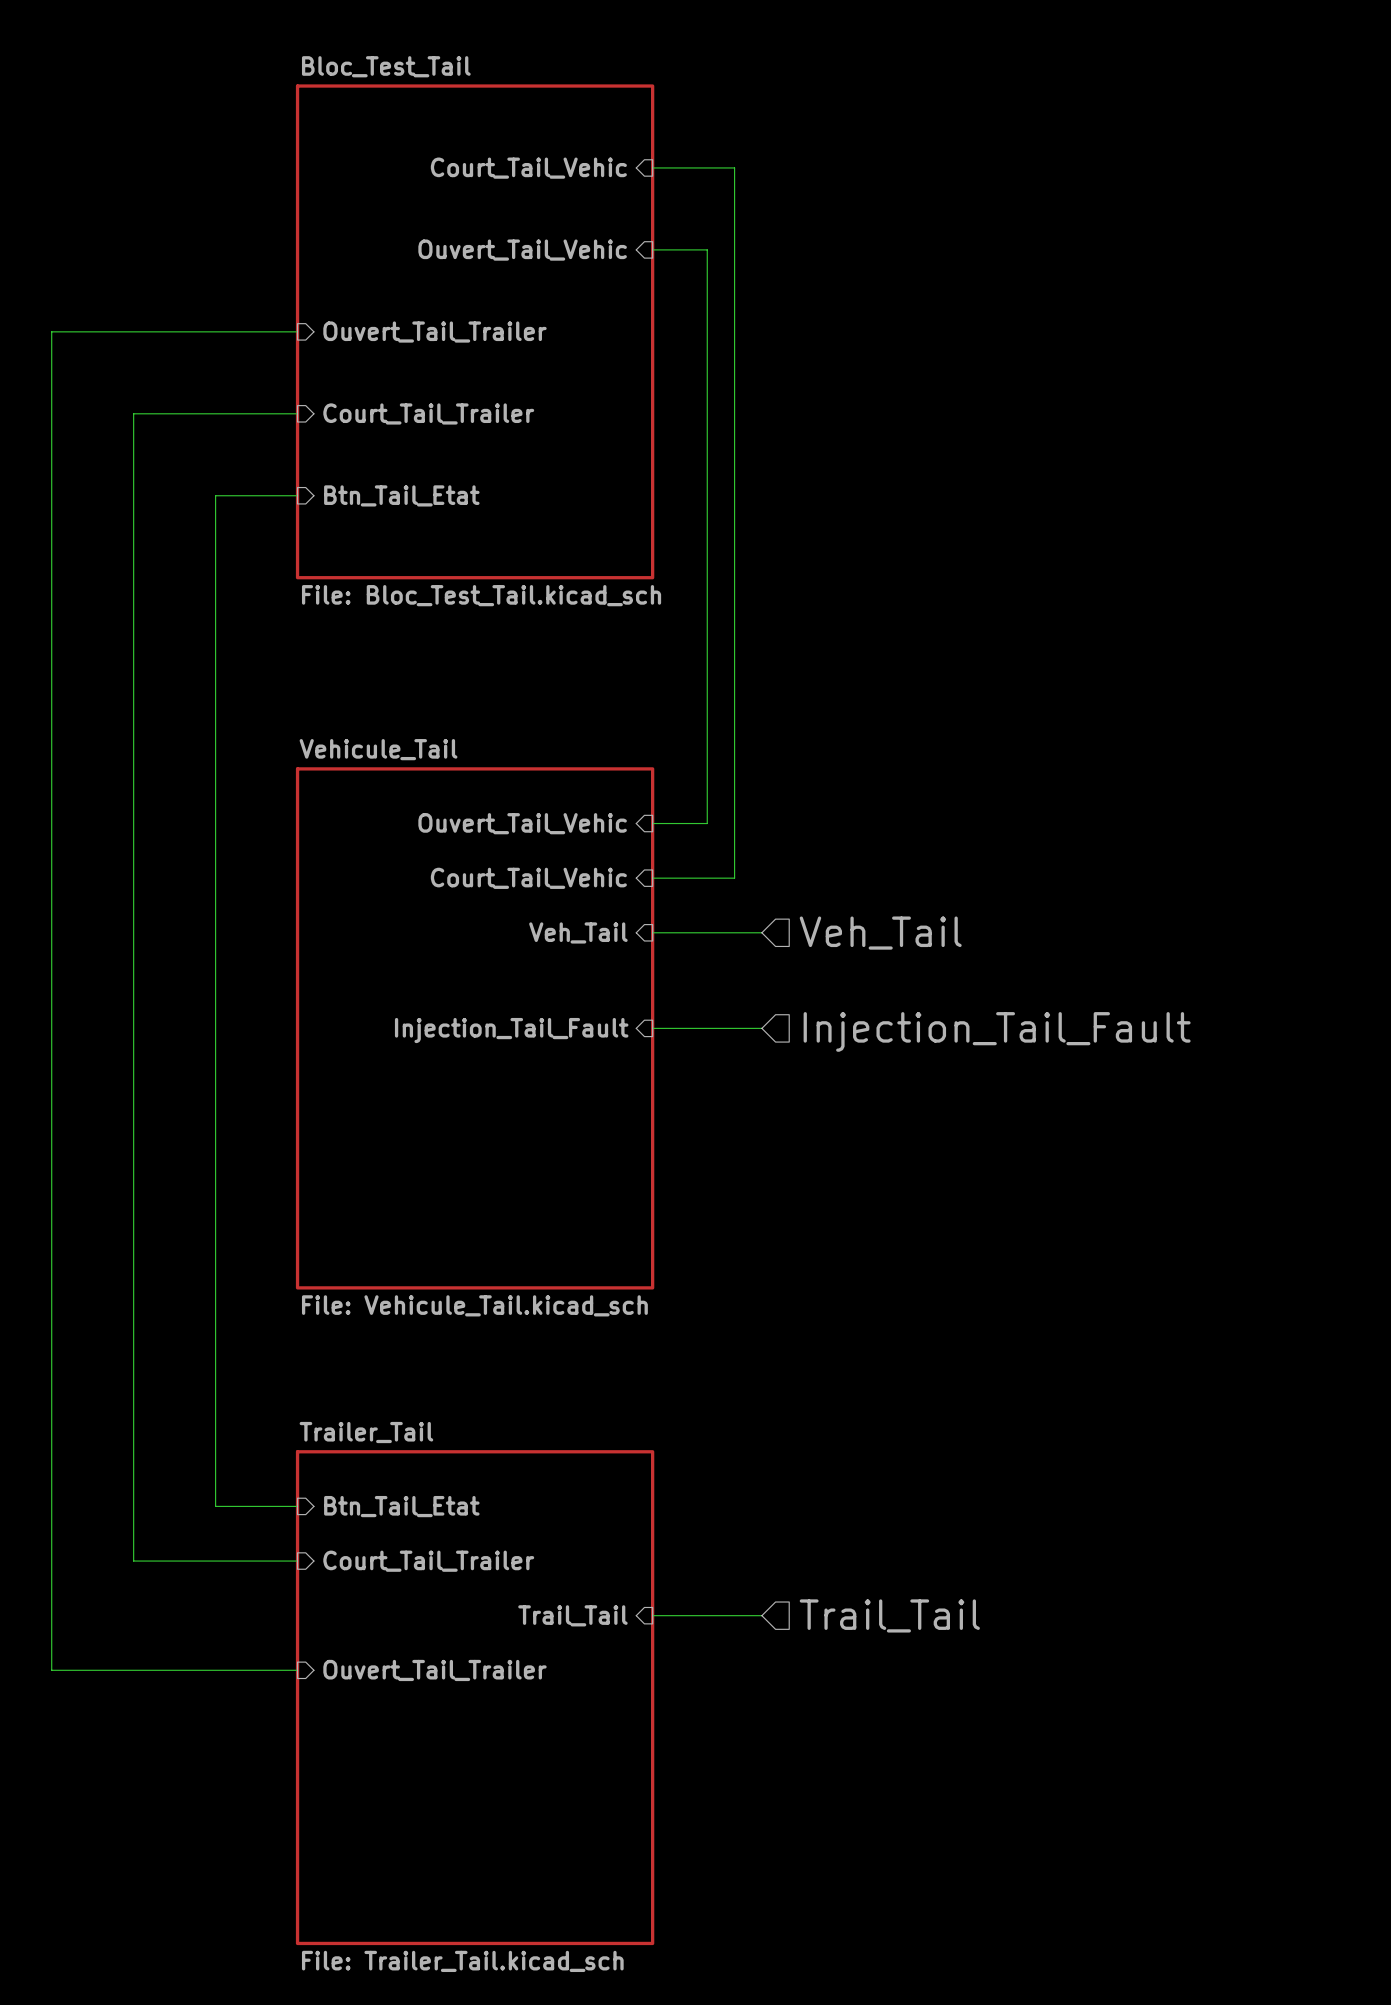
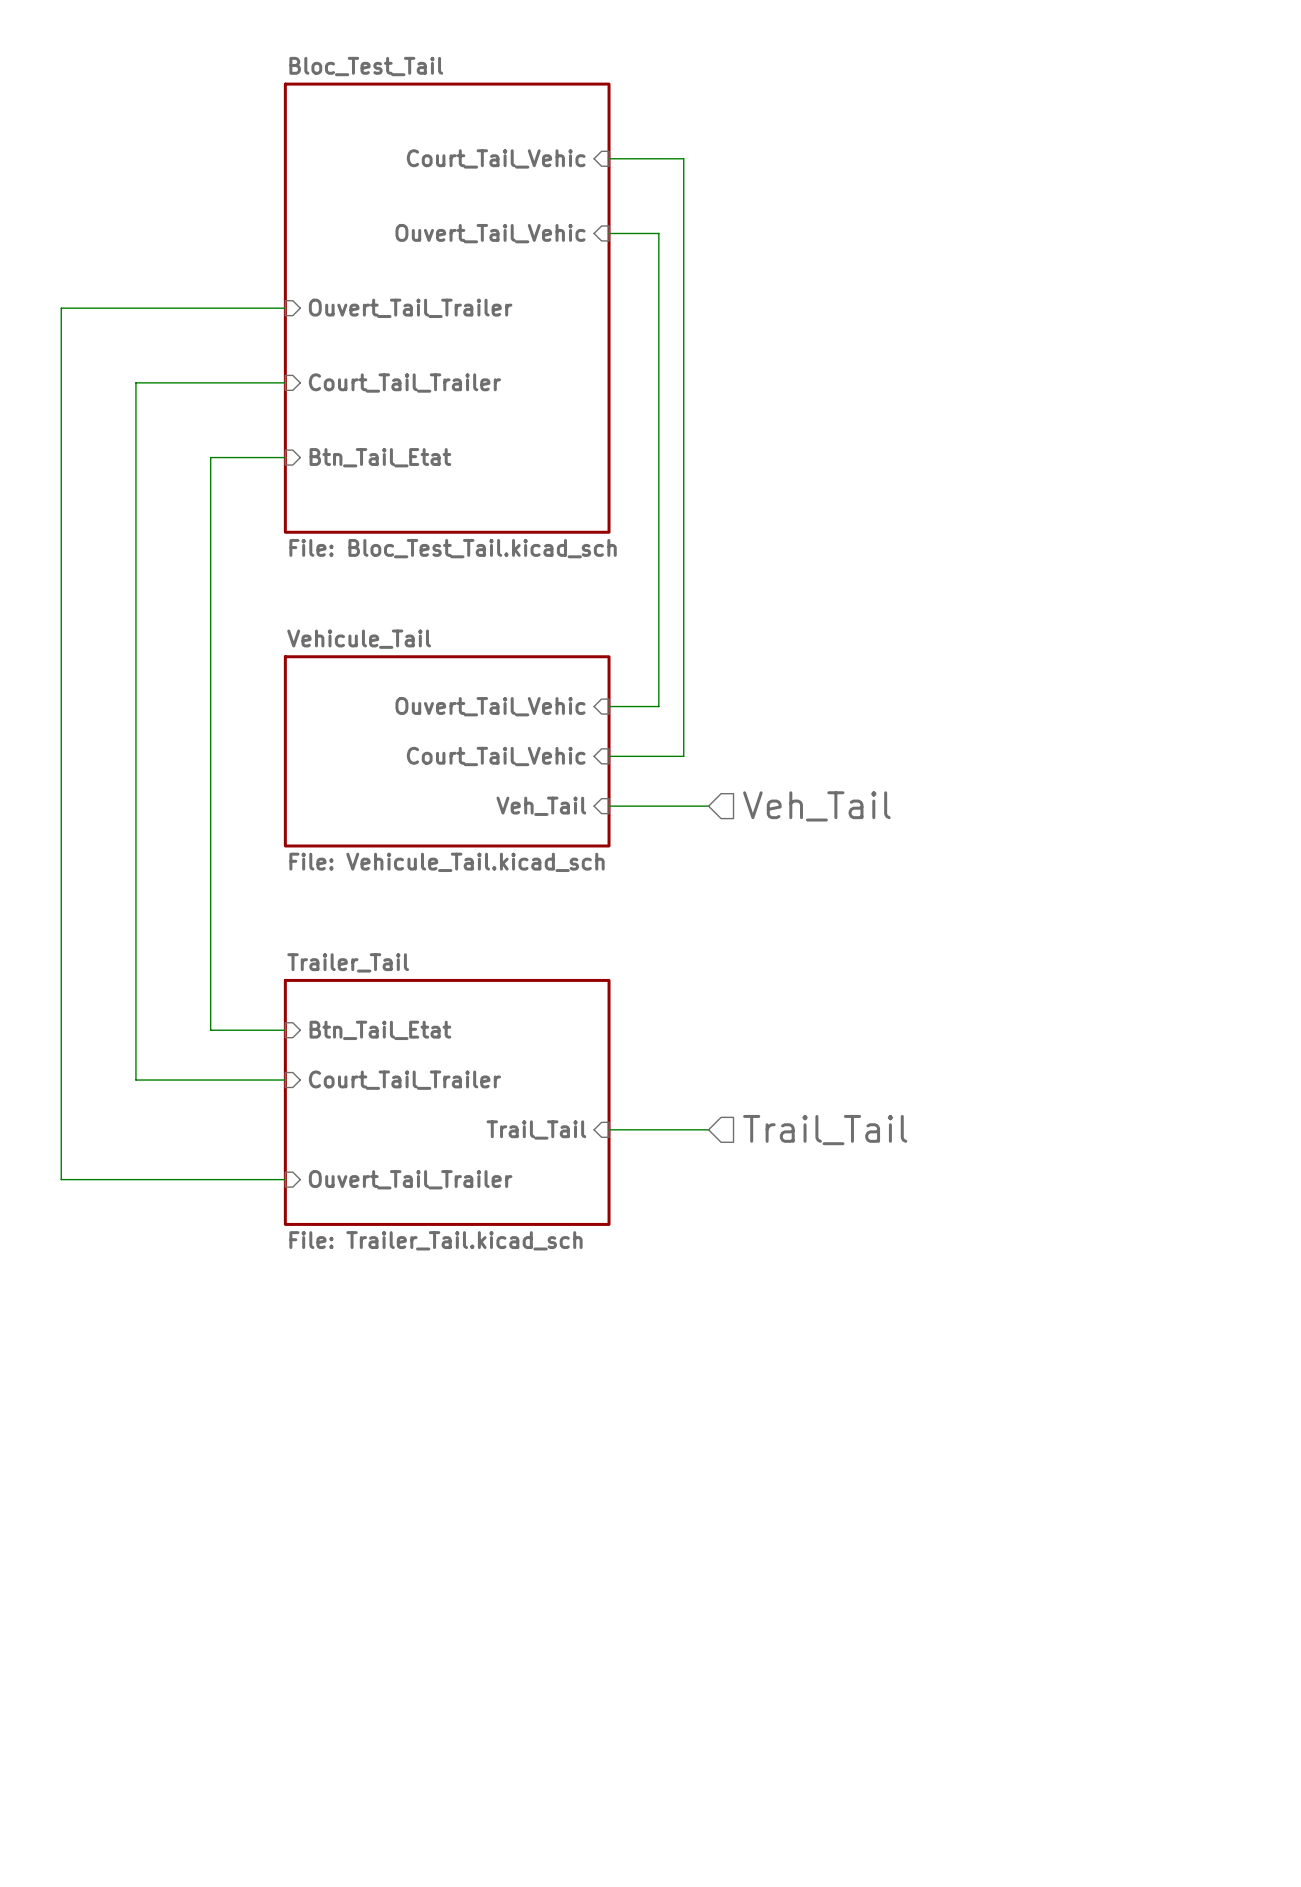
wire: none -> (609, 706) (658, 706)
wire: (707, 768) (707, 823) -> (683, 756) (658, 756)
sheet pin: none -> Ouvert_Tail_Vehic (490, 706)
sheet Vehicule_Tail: none -> File: Vehicule_Tail.kicad_sch (447, 751)
sheet pin: Ouvert_Tail_Vehic (522, 823) -> Court_Tail_Vehic (496, 756)
wire: (734, 823) (734, 878) -> (708, 806) (683, 806)
sheet pin: Court_Tail_Vehic (528, 878) -> Veh_Tail (541, 806)
sheet pin: Veh_Tail (578, 932) -> none
wire: (652, 932) (761, 932) -> none
hierarchical label position: Veh_Tail (880, 933) -> Veh_Tail (816, 806)
sheet Vehicule_Tail: File: Vehicule_Tail.kicad_sch (475, 1028) -> none
wire: (652, 1028) (761, 1028) -> (609, 1129) (708, 1129)
sheet pin: Injection_Tail_Fault (511, 1030) -> none
hierarchical label: Injection_Tail_Fault (997, 1031) -> none
wire: (215, 1123) (215, 1506) (297, 1506) -> (210, 1030) (285, 1030)
wire: (133, 1178) (133, 1561) (297, 1561) -> (135, 1080) (285, 1080)
sheet Trailer_Tail: none -> File: Trailer_Tail.kicad_sch (447, 1102)
wire: (51, 1287) (51, 1670) (297, 1670) -> (61, 1179) (285, 1179)
sheet pin position: Btn_Tail_Etat (401, 1506) -> Btn_Tail_Etat (380, 1030)
sheet pin position: Court_Tail_Trailer (428, 1561) -> Court_Tail_Trailer (404, 1080)
sheet pin position: Trail_Tail (572, 1615) -> Trail_Tail (536, 1129)
wire: (652, 1615) (761, 1615) -> none
hierarchical label position: Trail_Tail (889, 1615) -> Trail_Tail (825, 1130)
sheet pin position: Ouvert_Tail_Trailer (434, 1670) -> Ouvert_Tail_Trailer (410, 1179)
sheet Trailer_Tail: File: Trailer_Tail.kicad_sch (475, 1697) -> none

